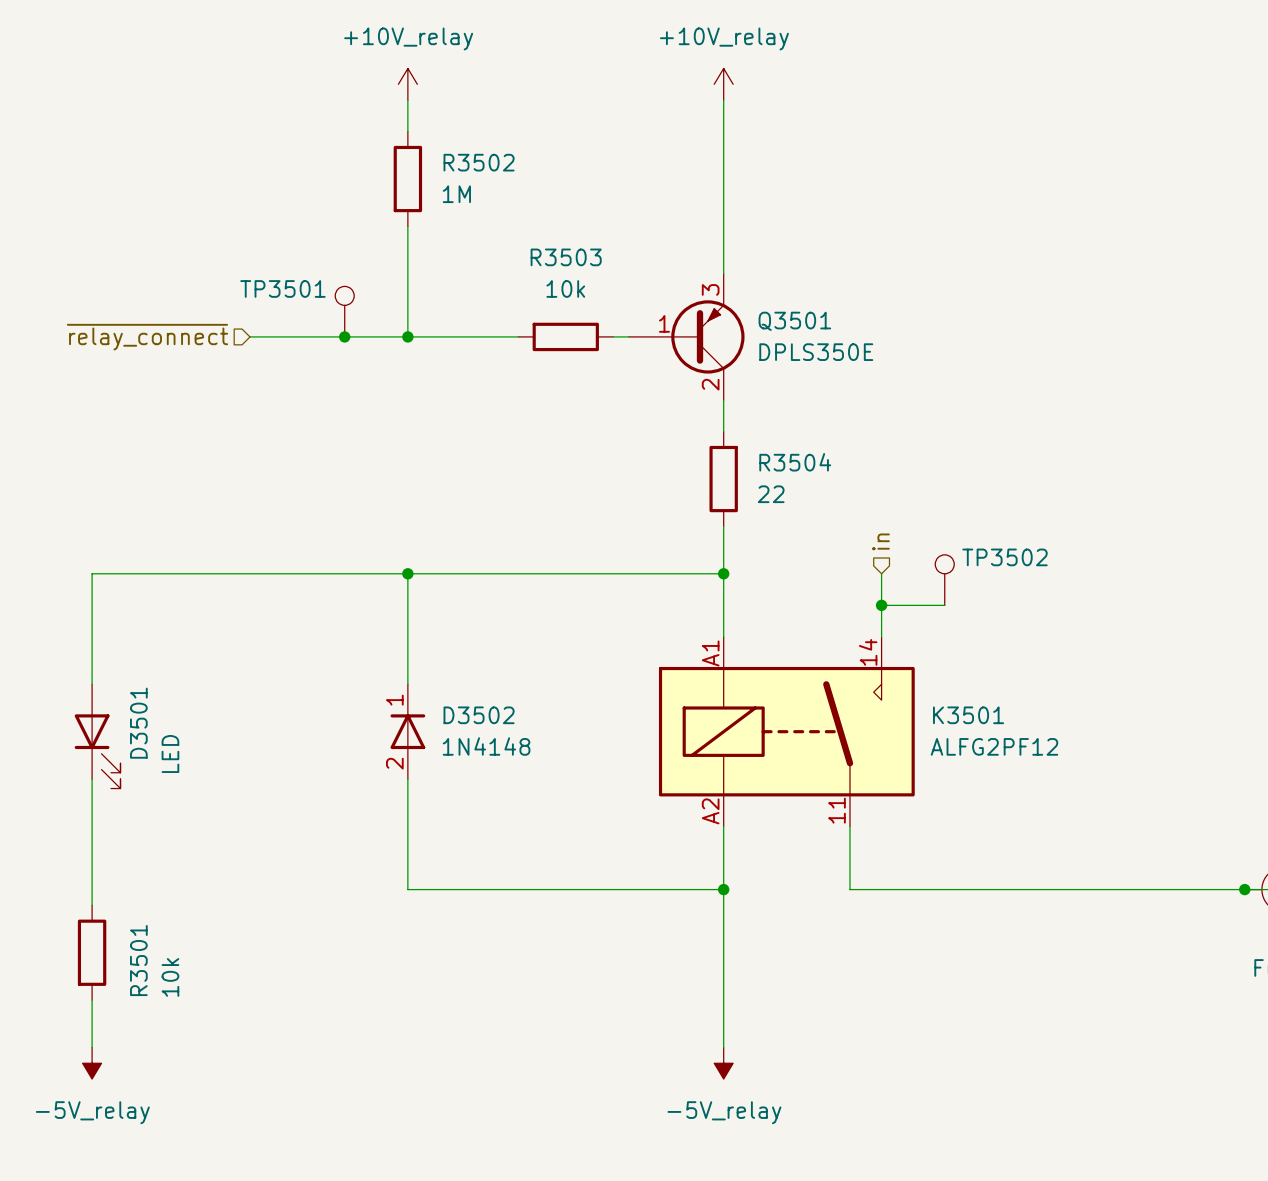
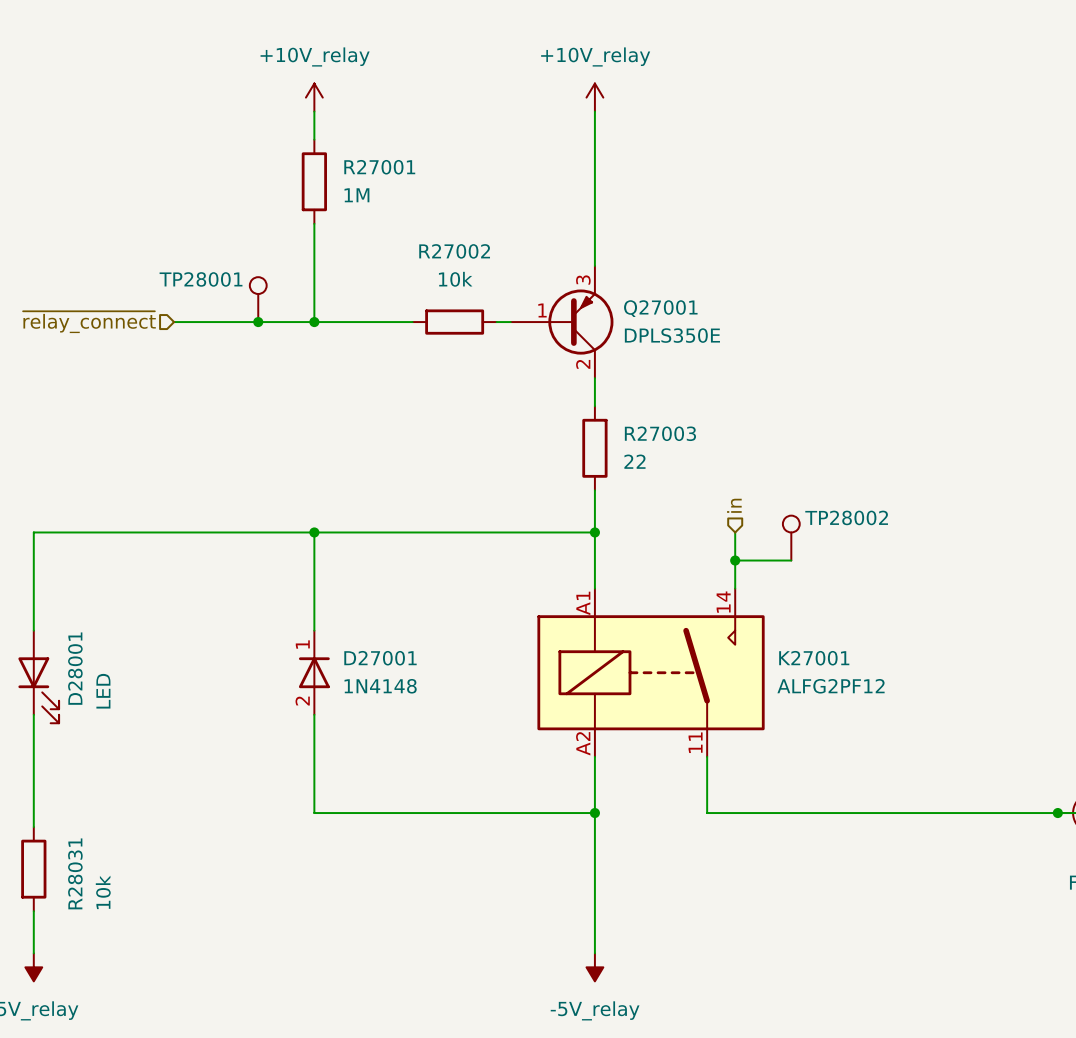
R3502 name: R3502 (479, 162) -> R27001 (379, 167)
R3503 name: R3503 (566, 257) -> R27002 (454, 251)
TP3501 name: TP3501 (282, 288) -> TP28001 (201, 279)
Q3501 name: Q3501 (794, 321) -> Q27001 (660, 308)
R3504 name: R3504 (795, 462) -> R27003 (660, 433)
TP3502 name: TP3502 (1005, 557) -> TP28002 (846, 517)
D3502 name: D3502 (479, 715) -> D27001 (380, 658)
K3501 name: K3501 (968, 715) -> K27001 (814, 658)
D3501 name: D3501 (138, 723) -> D28001 (75, 668)
R3501 name: R3501 (138, 960) -> R28031 (75, 873)

